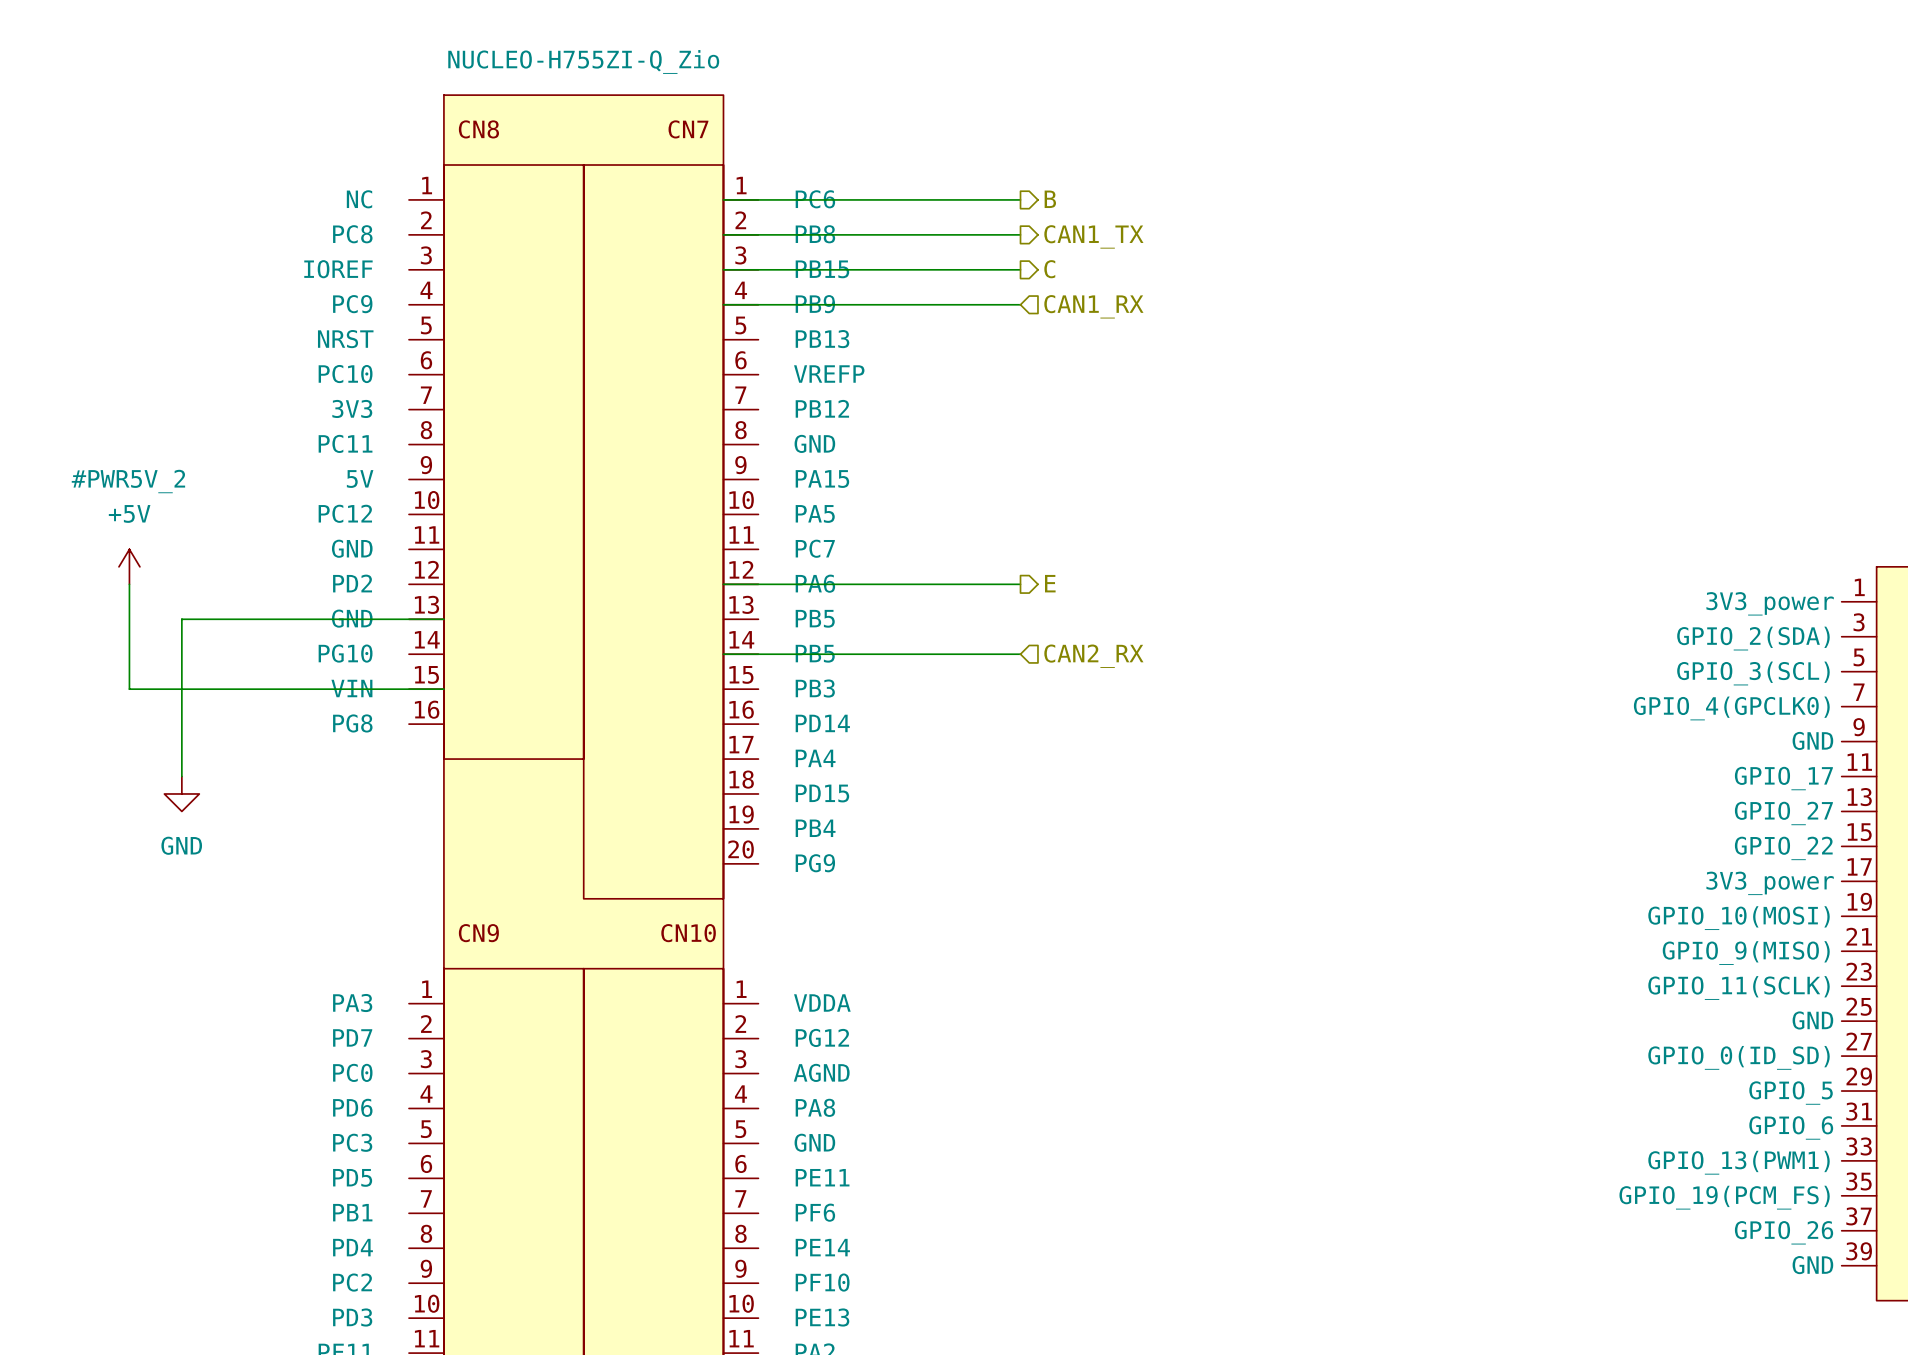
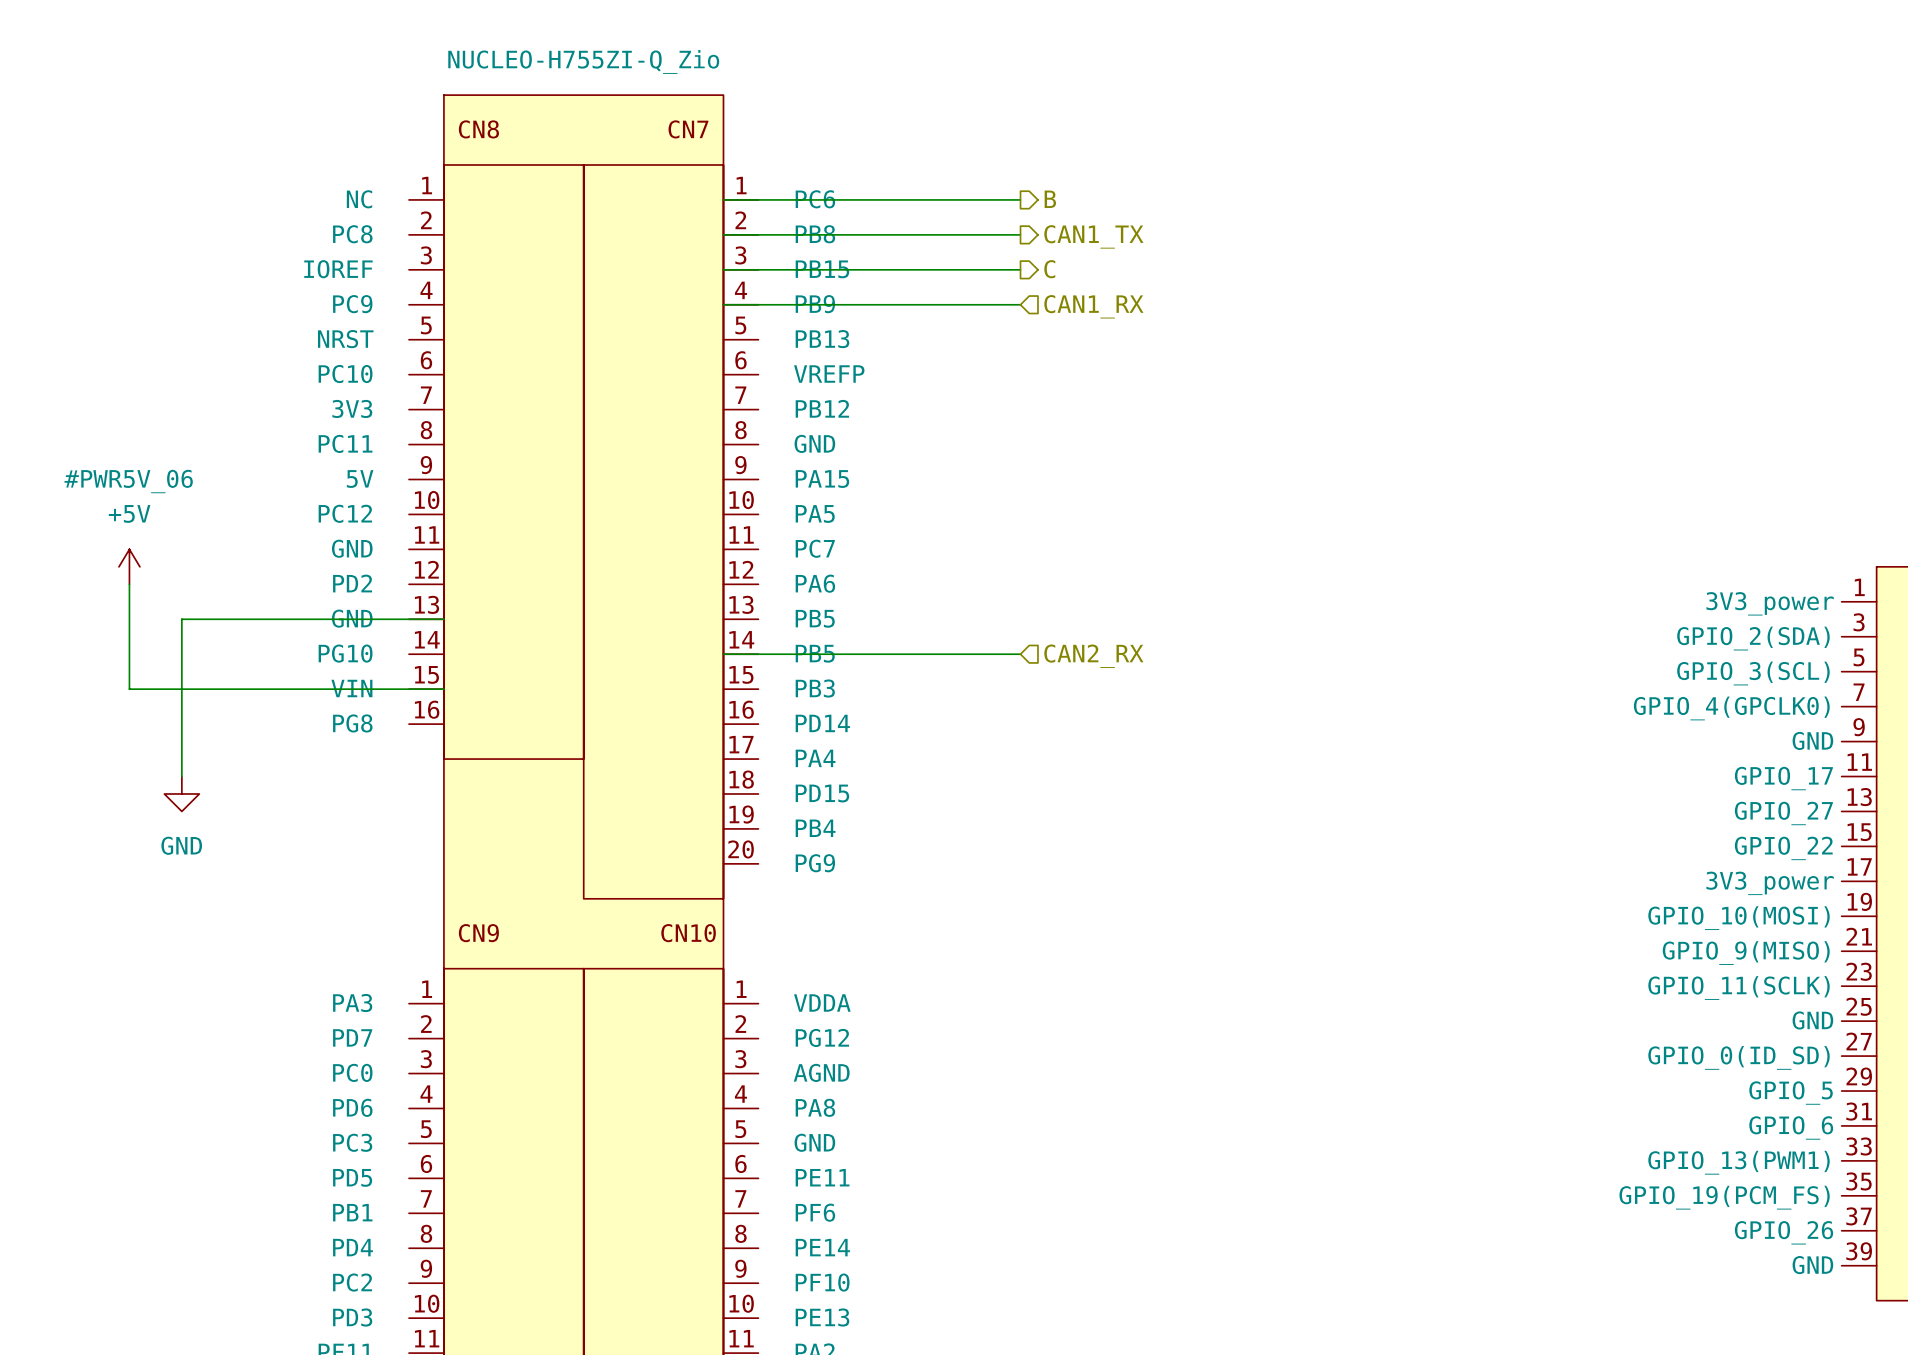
#PWR5V_2 name: #PWR5V_2 (128, 481) -> #PWR5V_06 (128, 481)
hierarchical label: E (1050, 583) -> none
wire: (723, 584) (1020, 584) -> none

